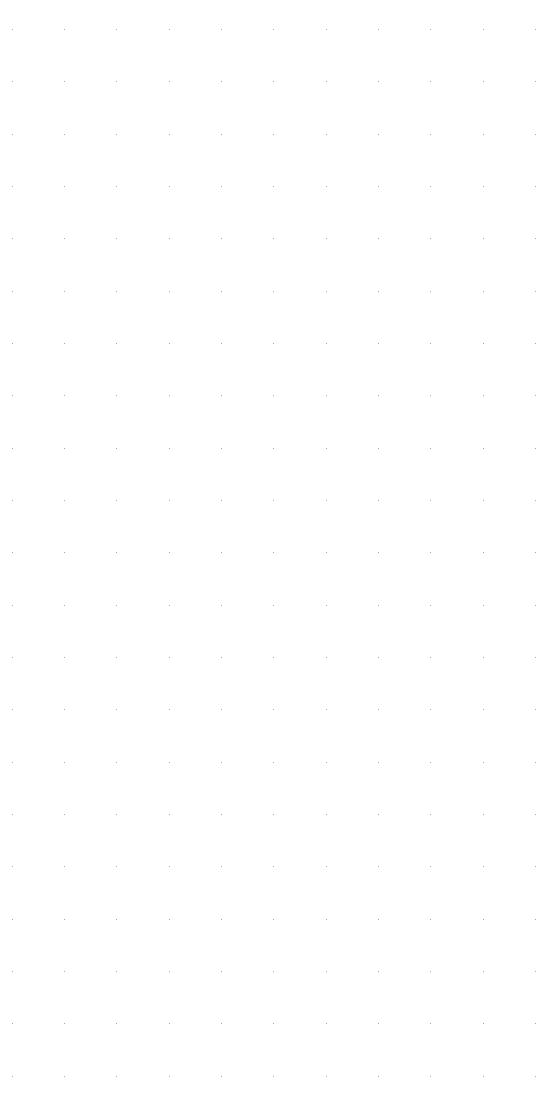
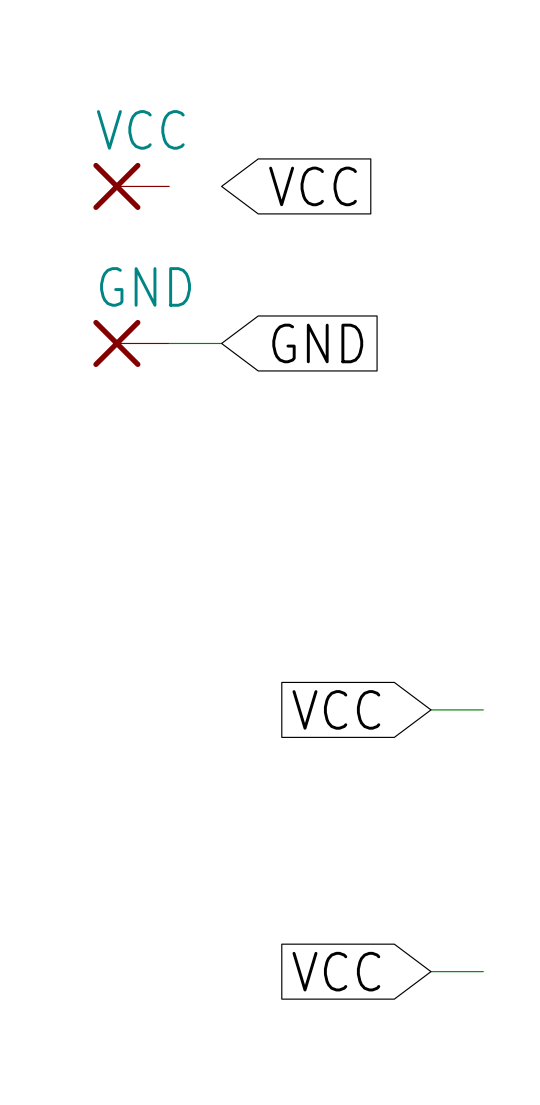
VCC: none -> (131, 186)
global label: none -> VCC (313, 186)
GND: none -> (131, 343)
wire: none -> (169, 343) (221, 343)
global label: none -> GND (317, 343)
global label: none -> VCC (336, 709)
wire: none -> (430, 709) (483, 709)
global label: none -> VCC (336, 971)
wire: none -> (430, 971) (483, 971)

